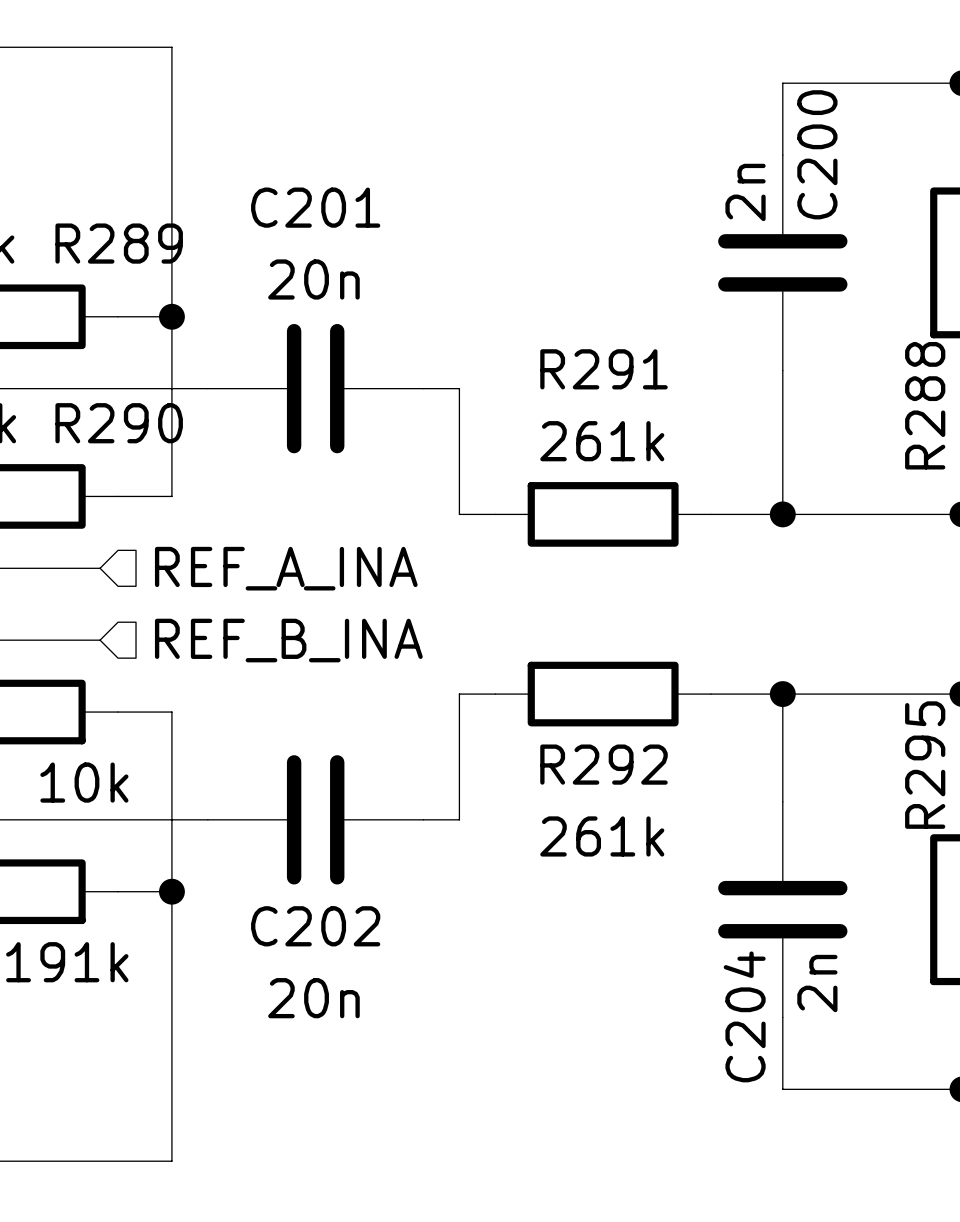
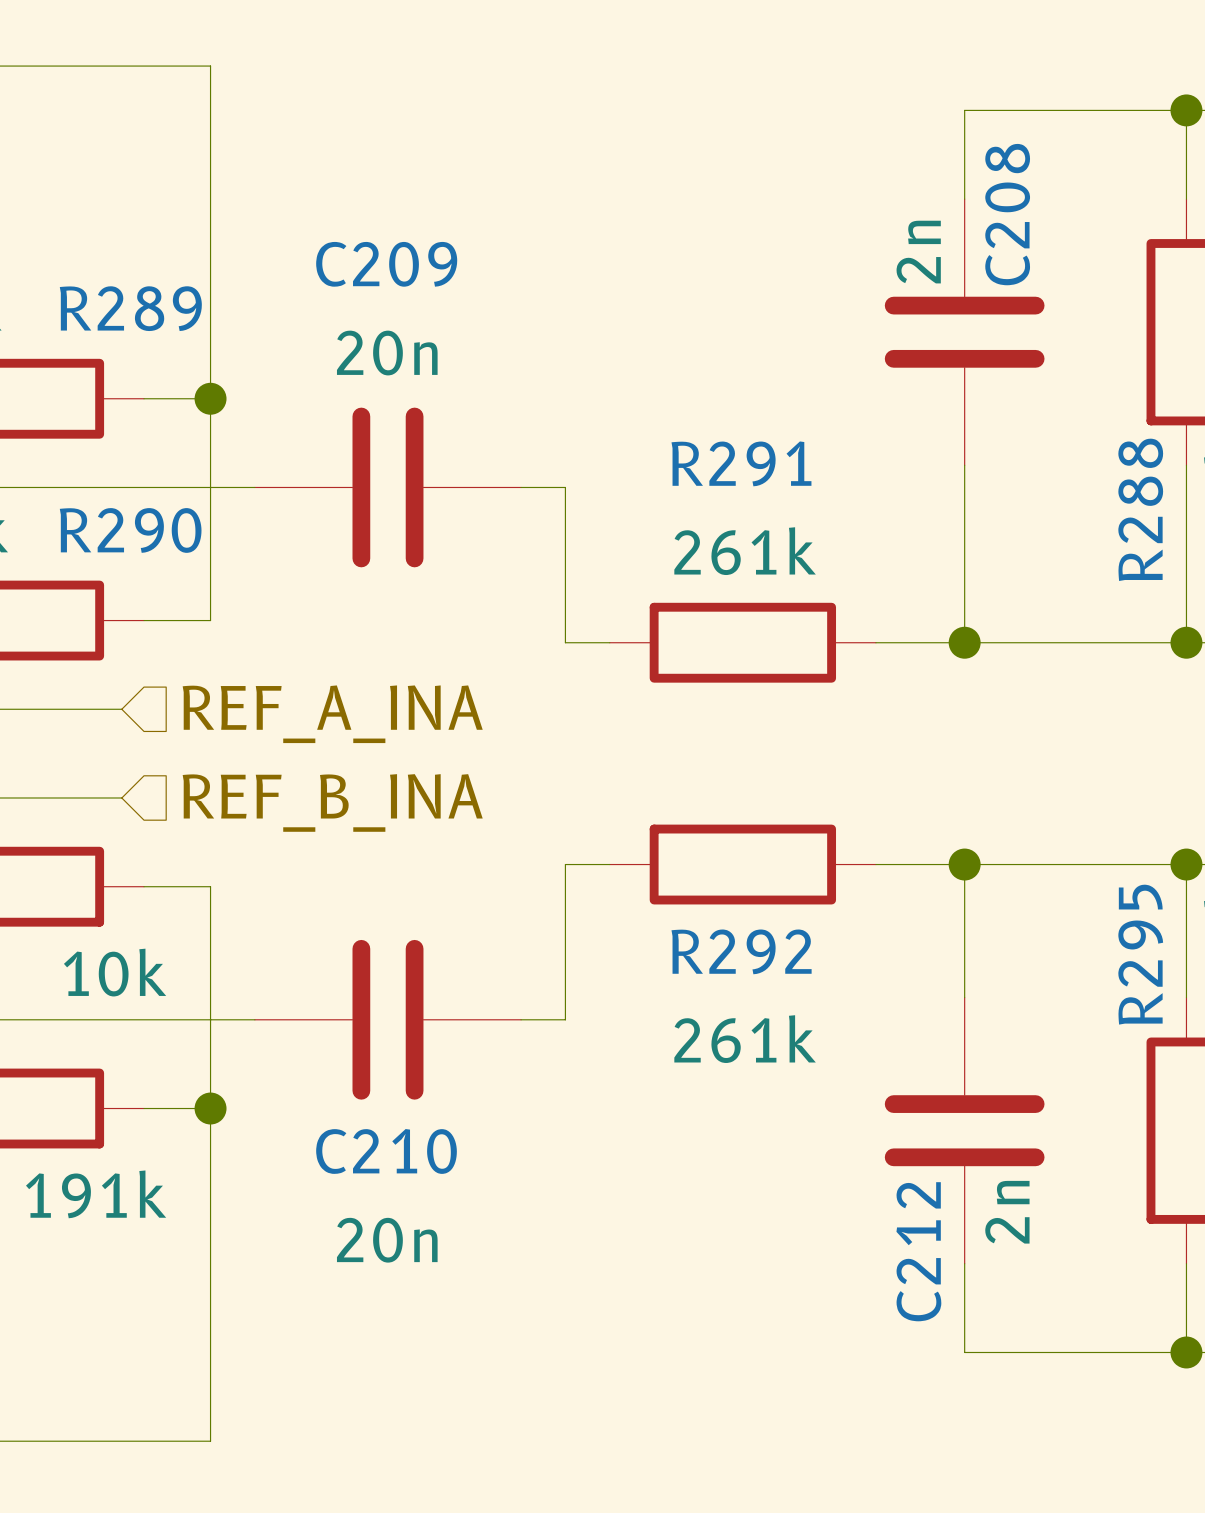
C200 name: C200 (817, 154) -> C208 (1007, 214)
C201 name: C201 (315, 207) -> C209 (386, 264)
C202 name: C202 (315, 926) -> C210 (386, 1151)
C204 name: C204 (744, 1016) -> C212 (918, 1251)

